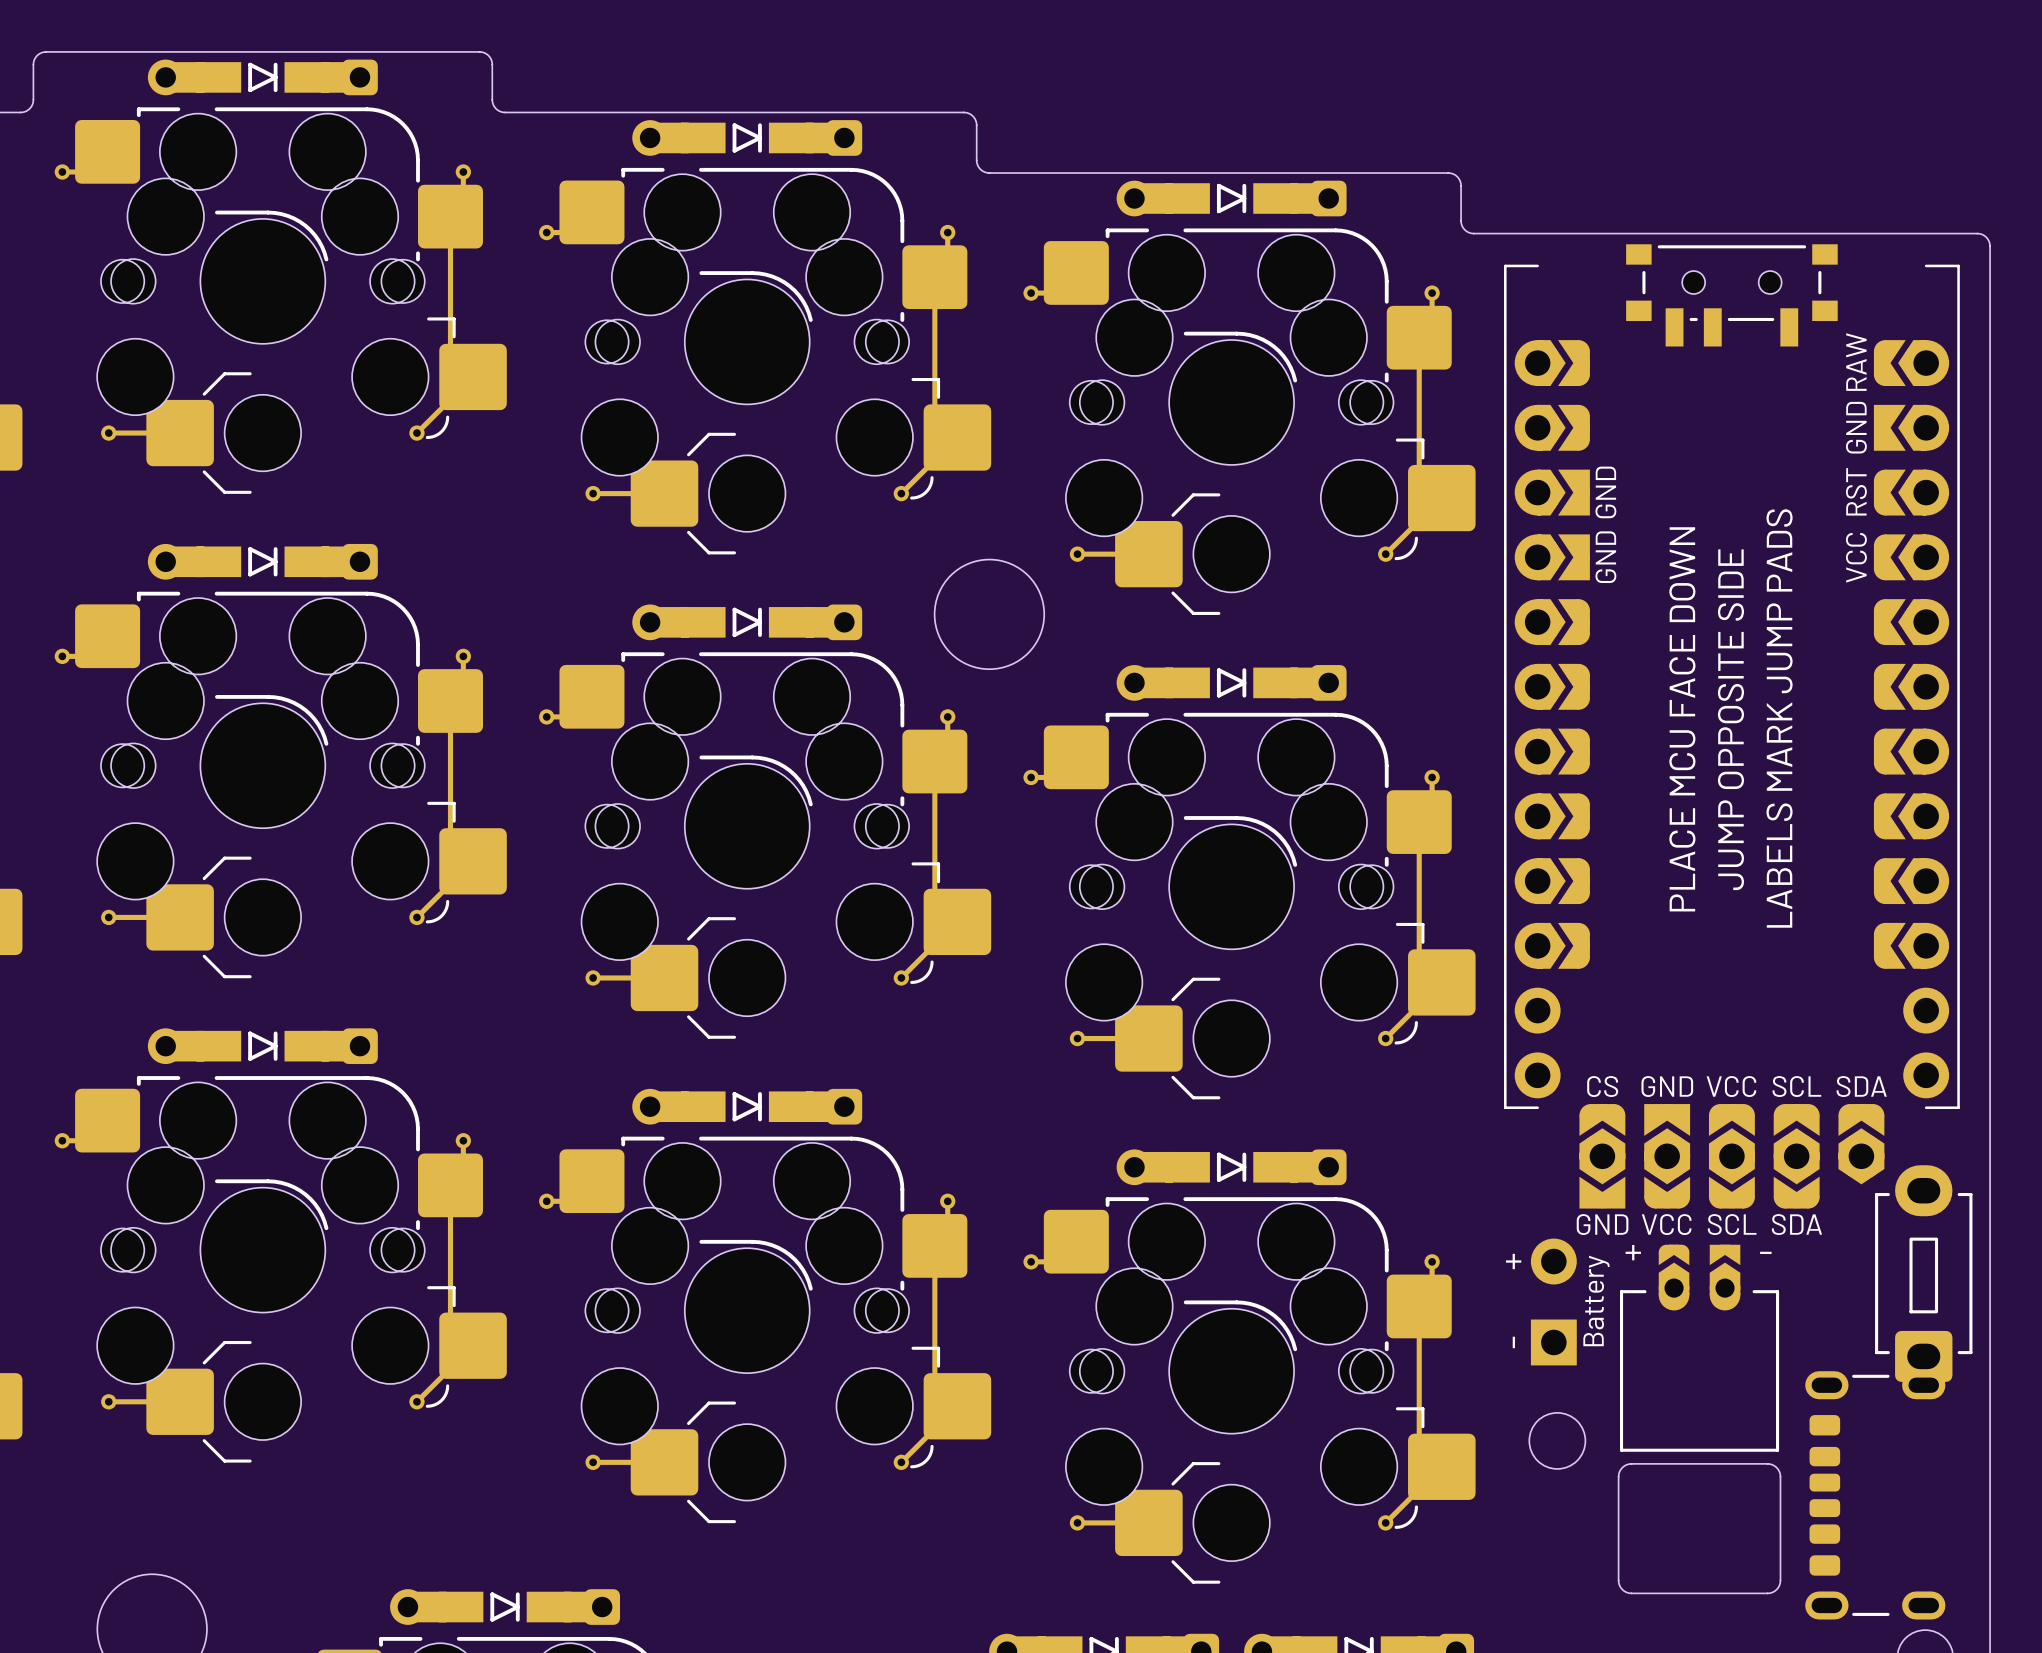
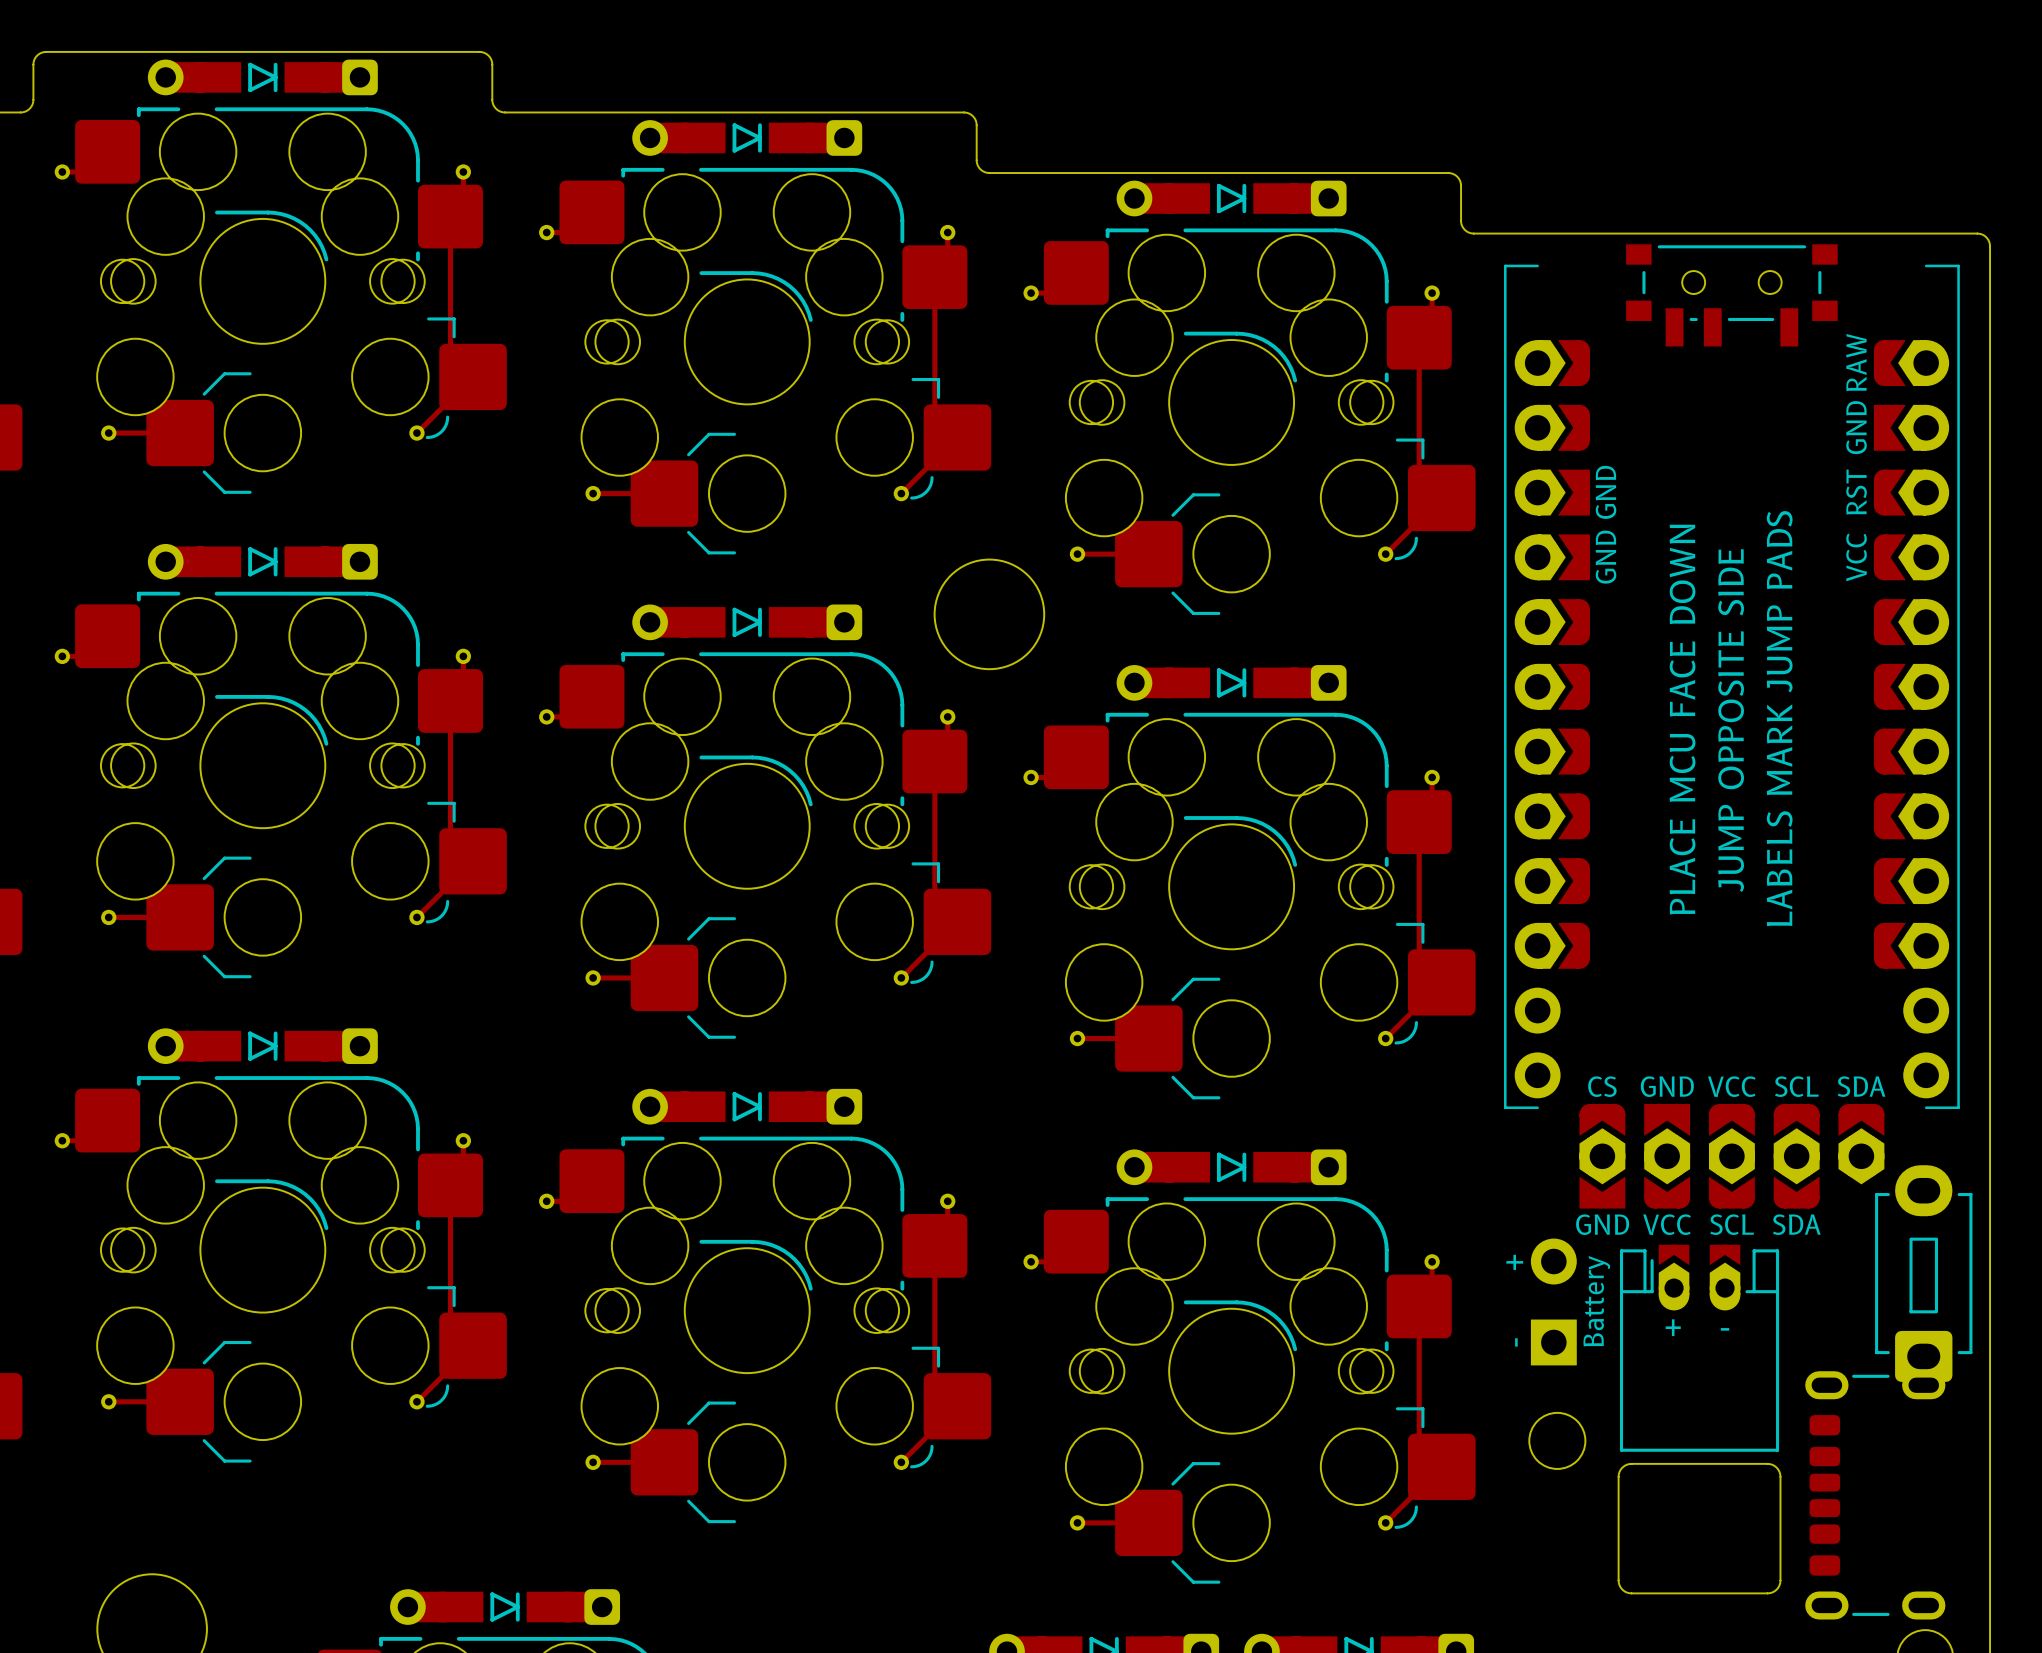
part footprint: [1504, 264, 1960, 1110] -> [1504, 264, 1960, 1110]
part footprint: [1579, 1104, 1885, 1209] -> [1579, 1104, 1885, 1209]
part footprint: [1620, 1244, 1780, 1452] -> [1620, 1244, 1780, 1452]

